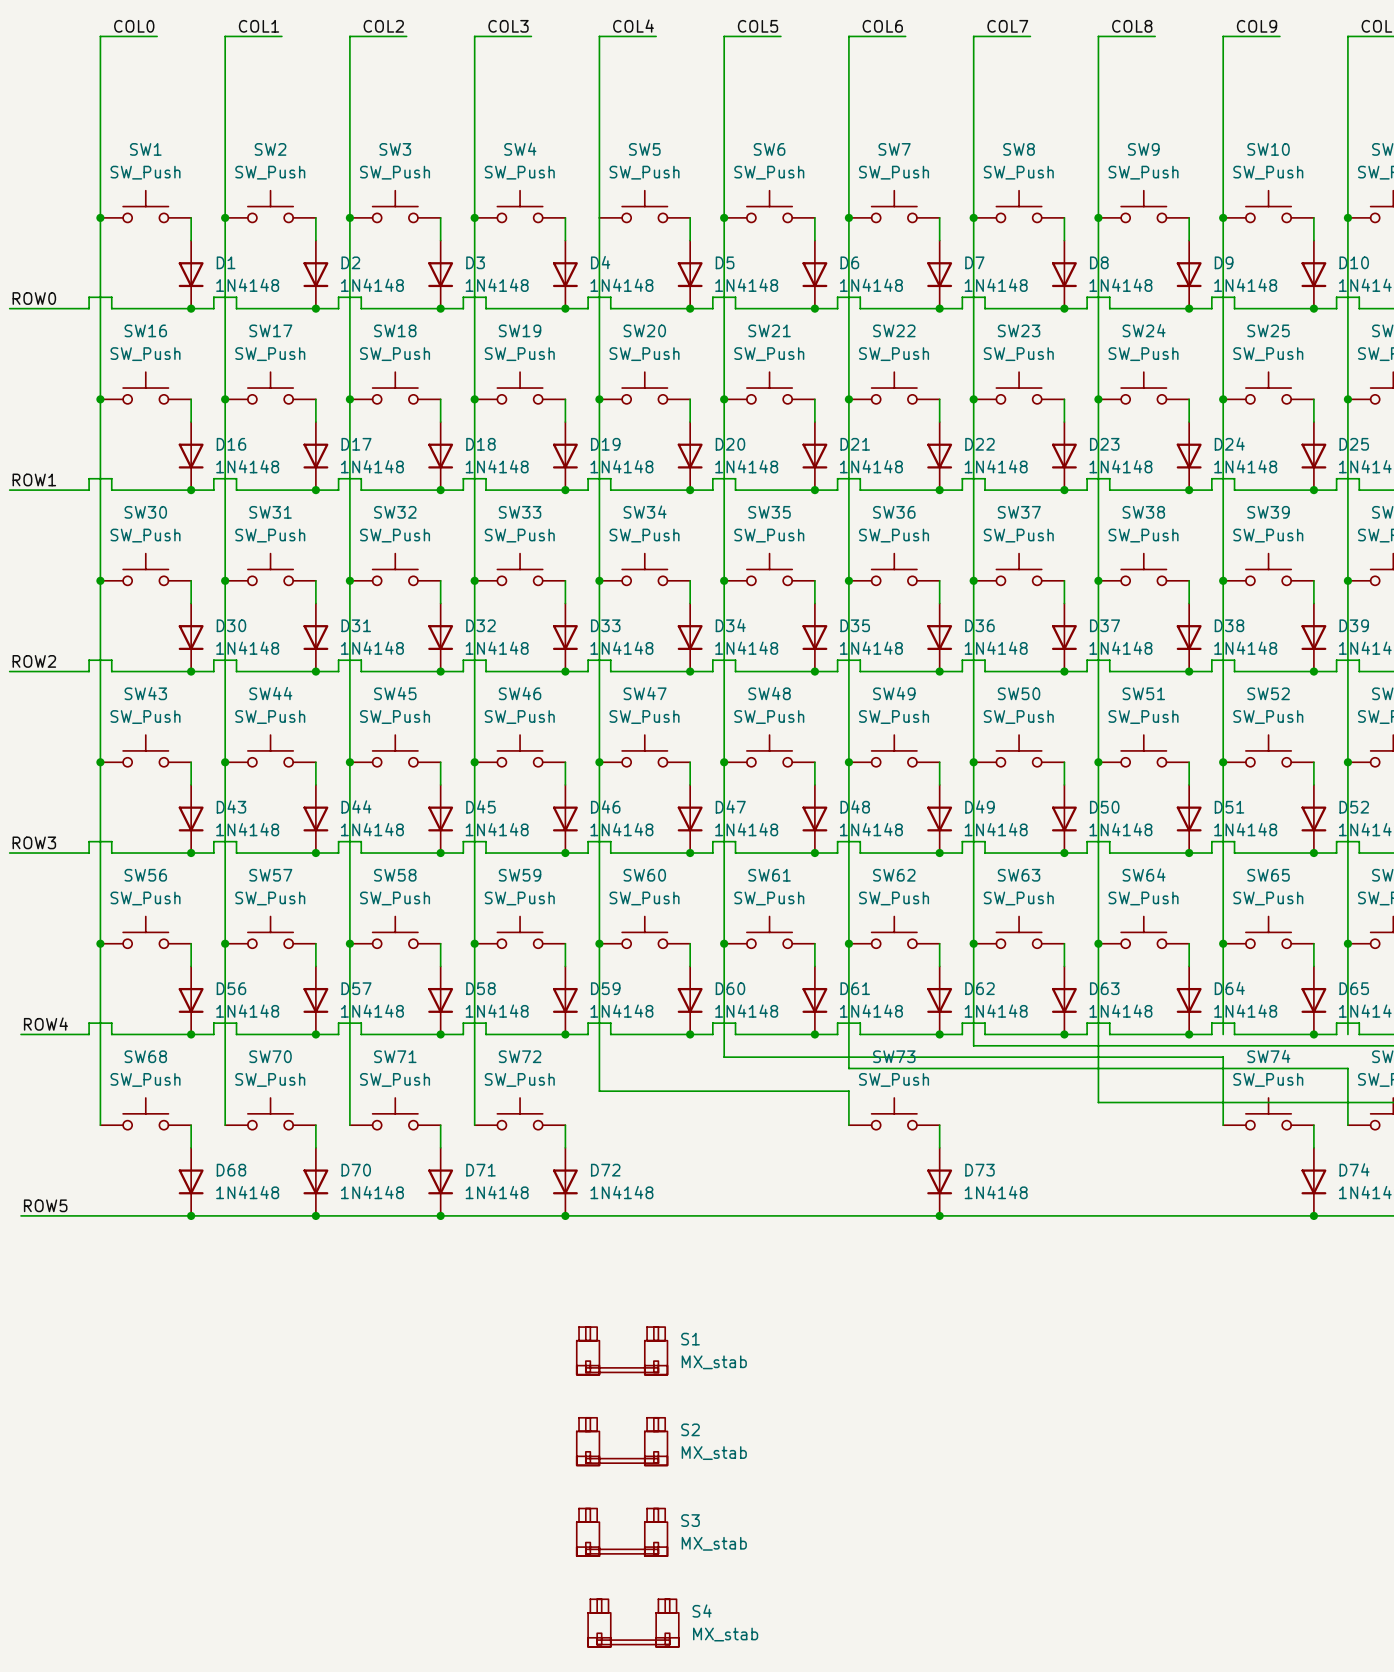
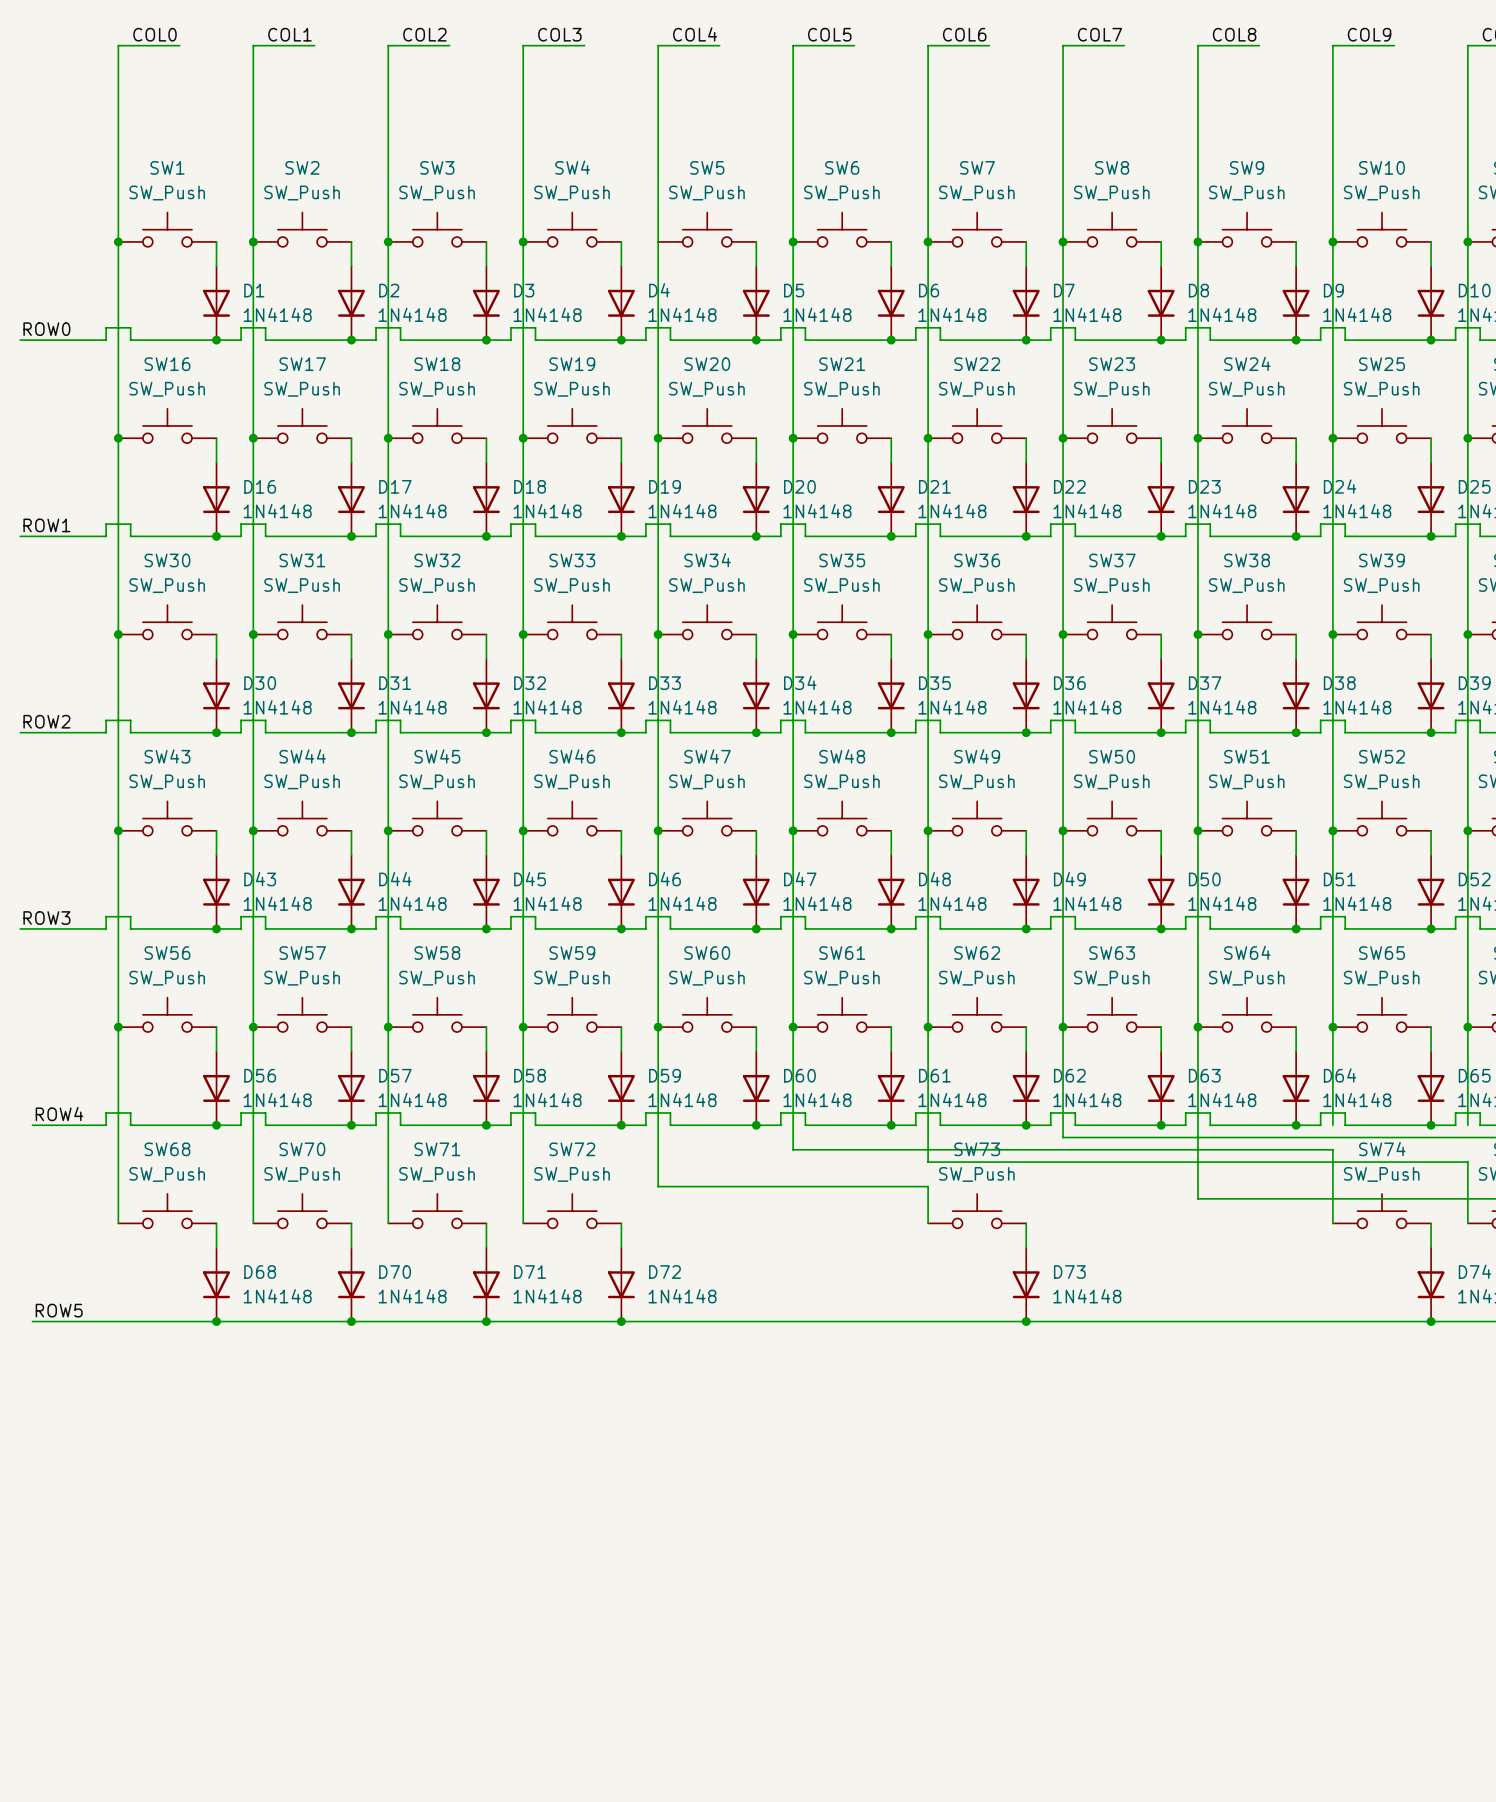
S1: MX_stab (622, 1350) -> none
S2: MX_stab (622, 1441) -> none
S3: MX_stab (622, 1532) -> none
S4: MX_stab (633, 1623) -> none

